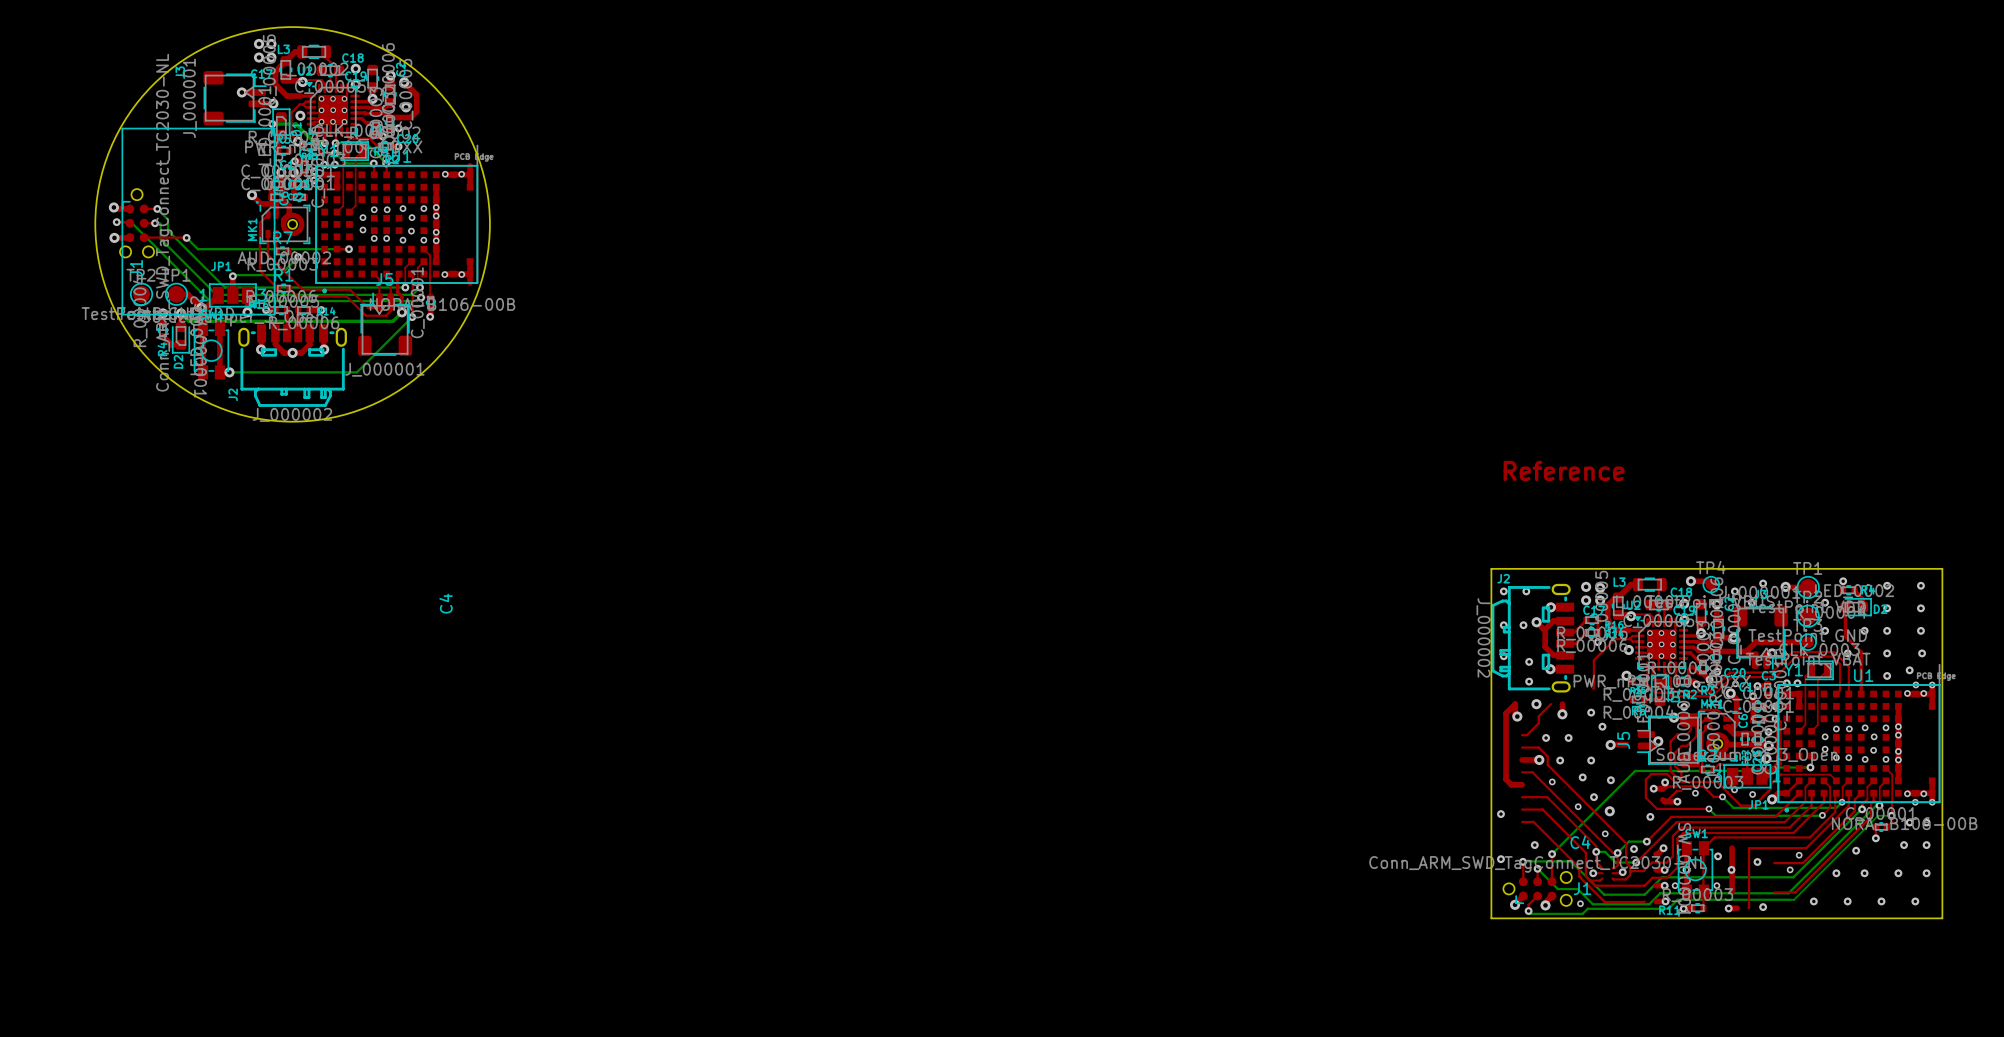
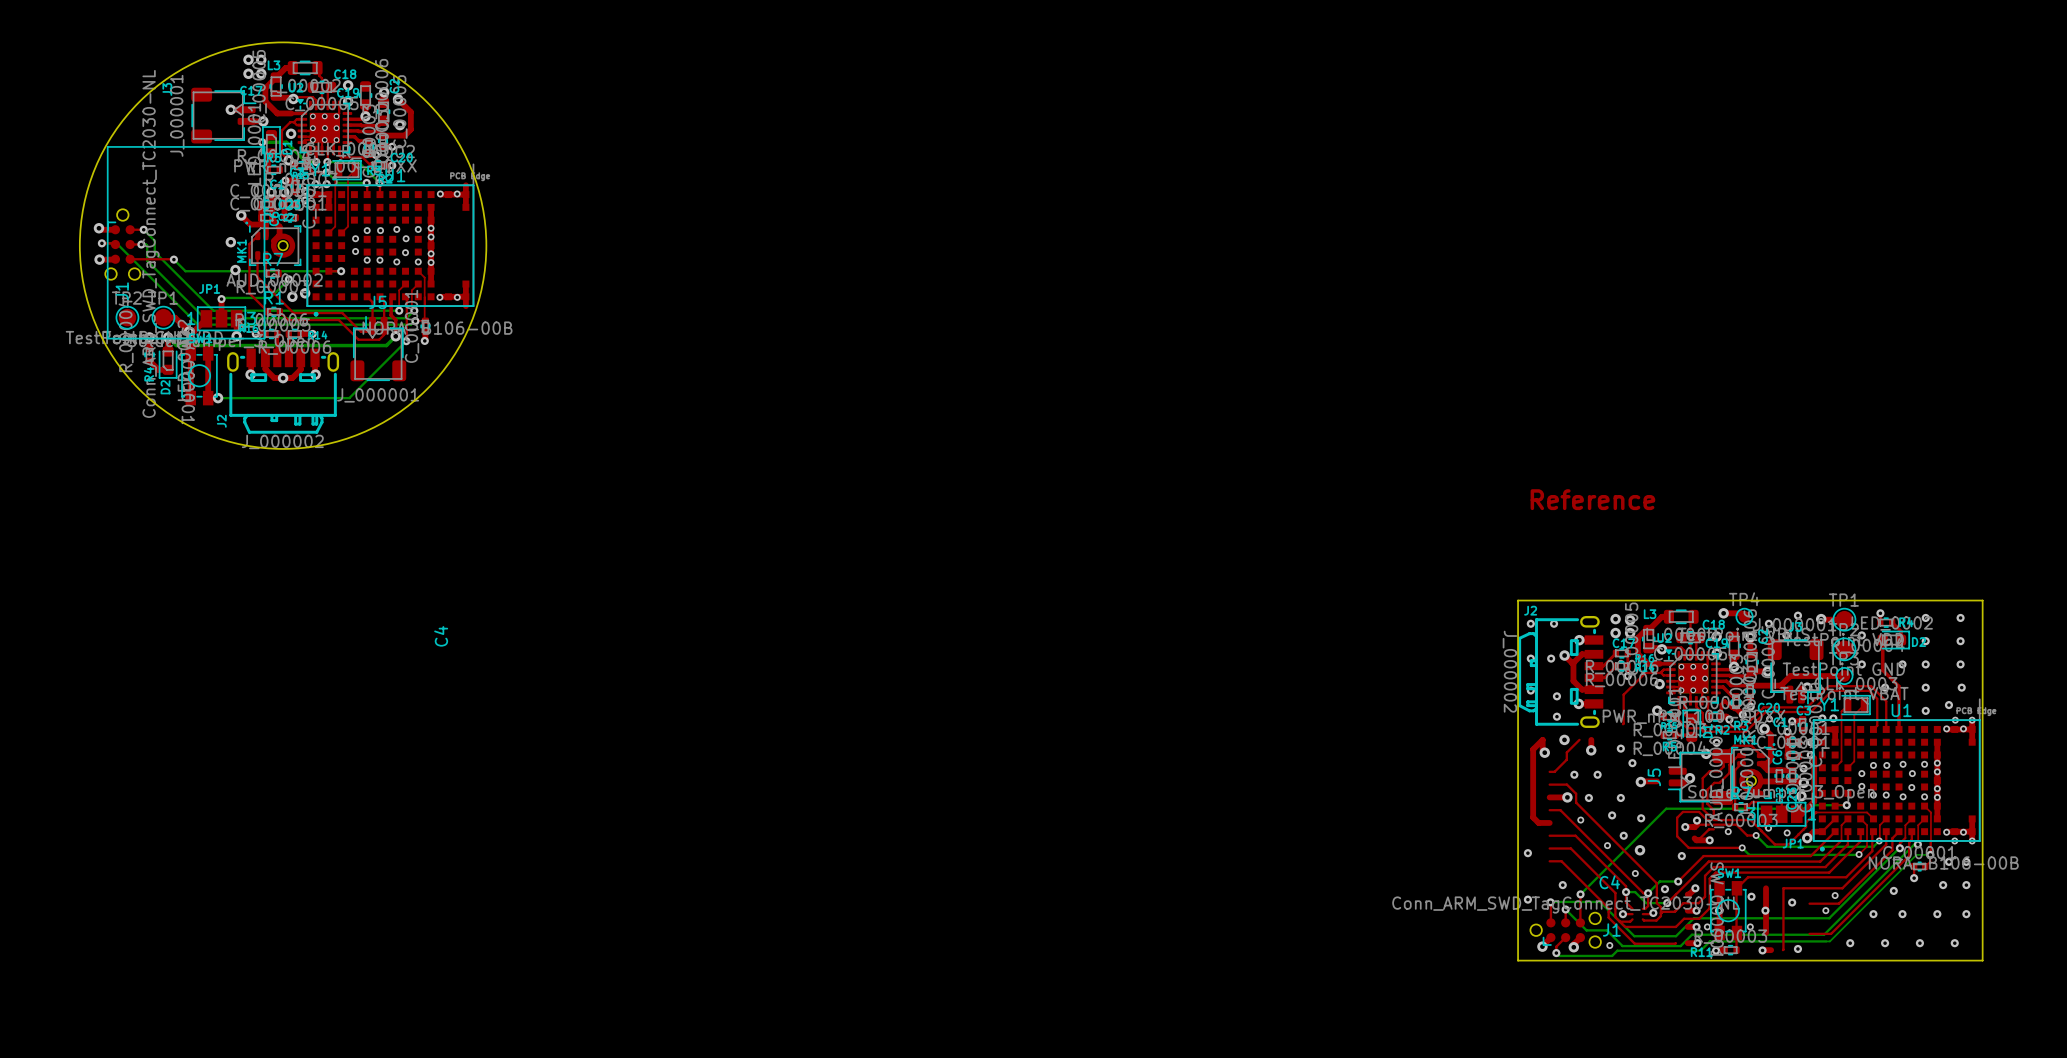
via: none -> (230, 242)
via: none -> (235, 270)
via: none -> (305, 293)
via: none -> (292, 296)

